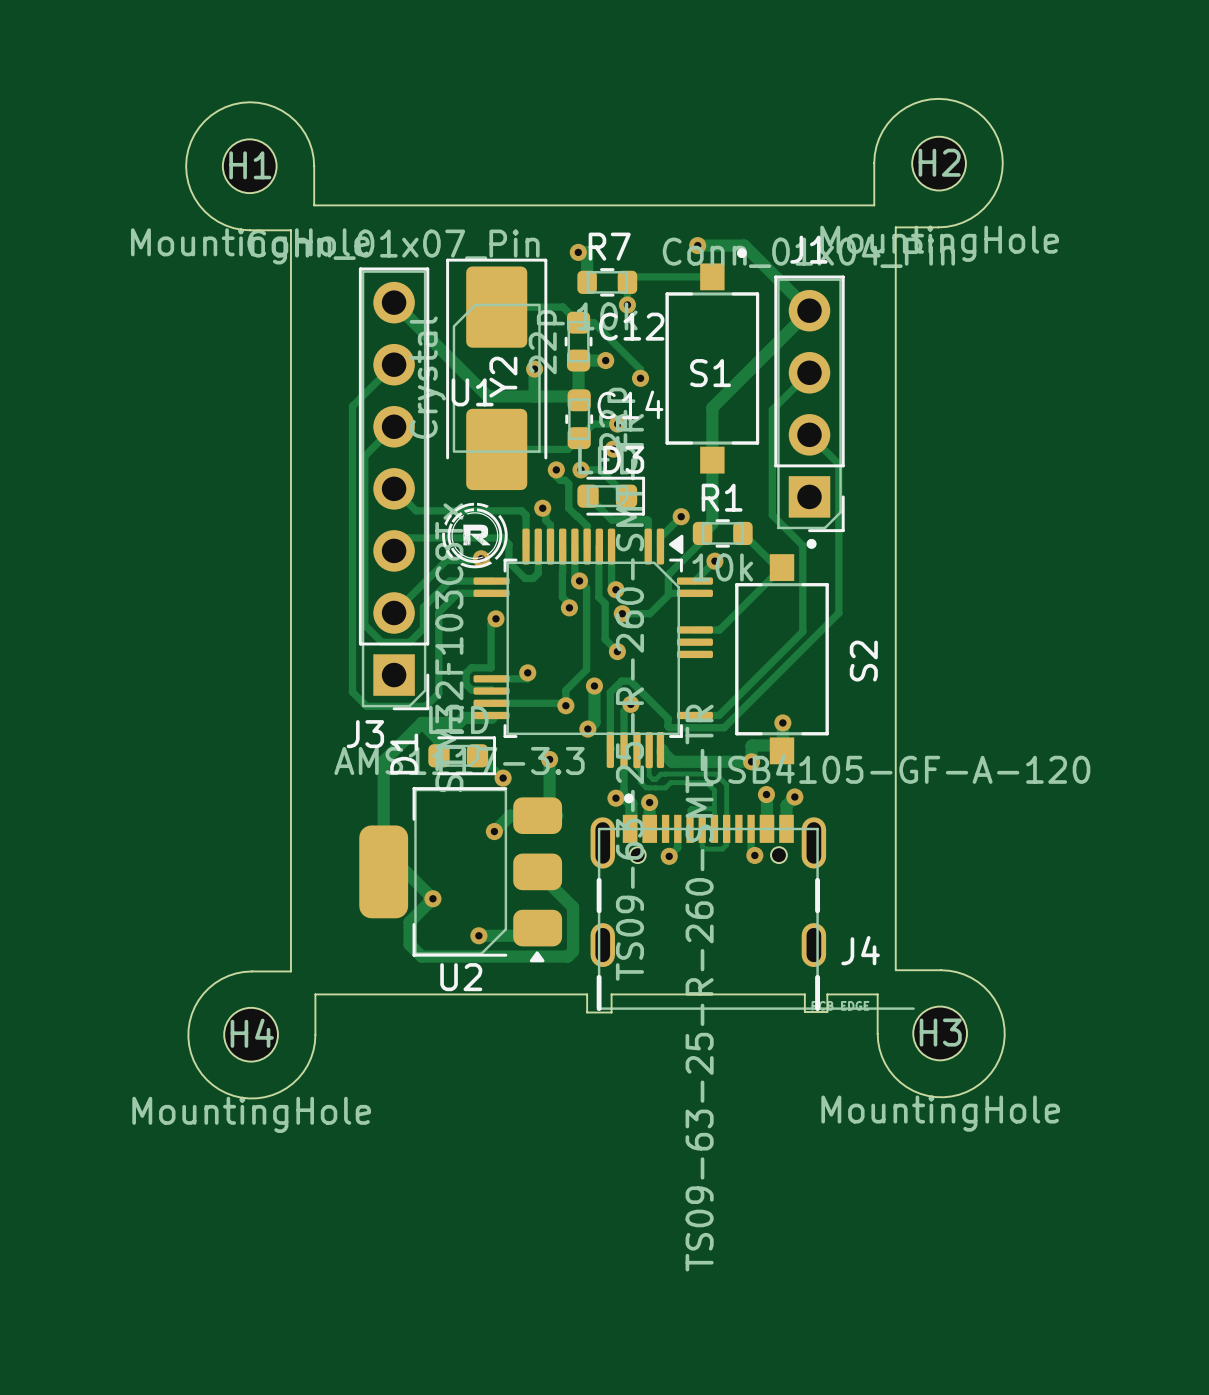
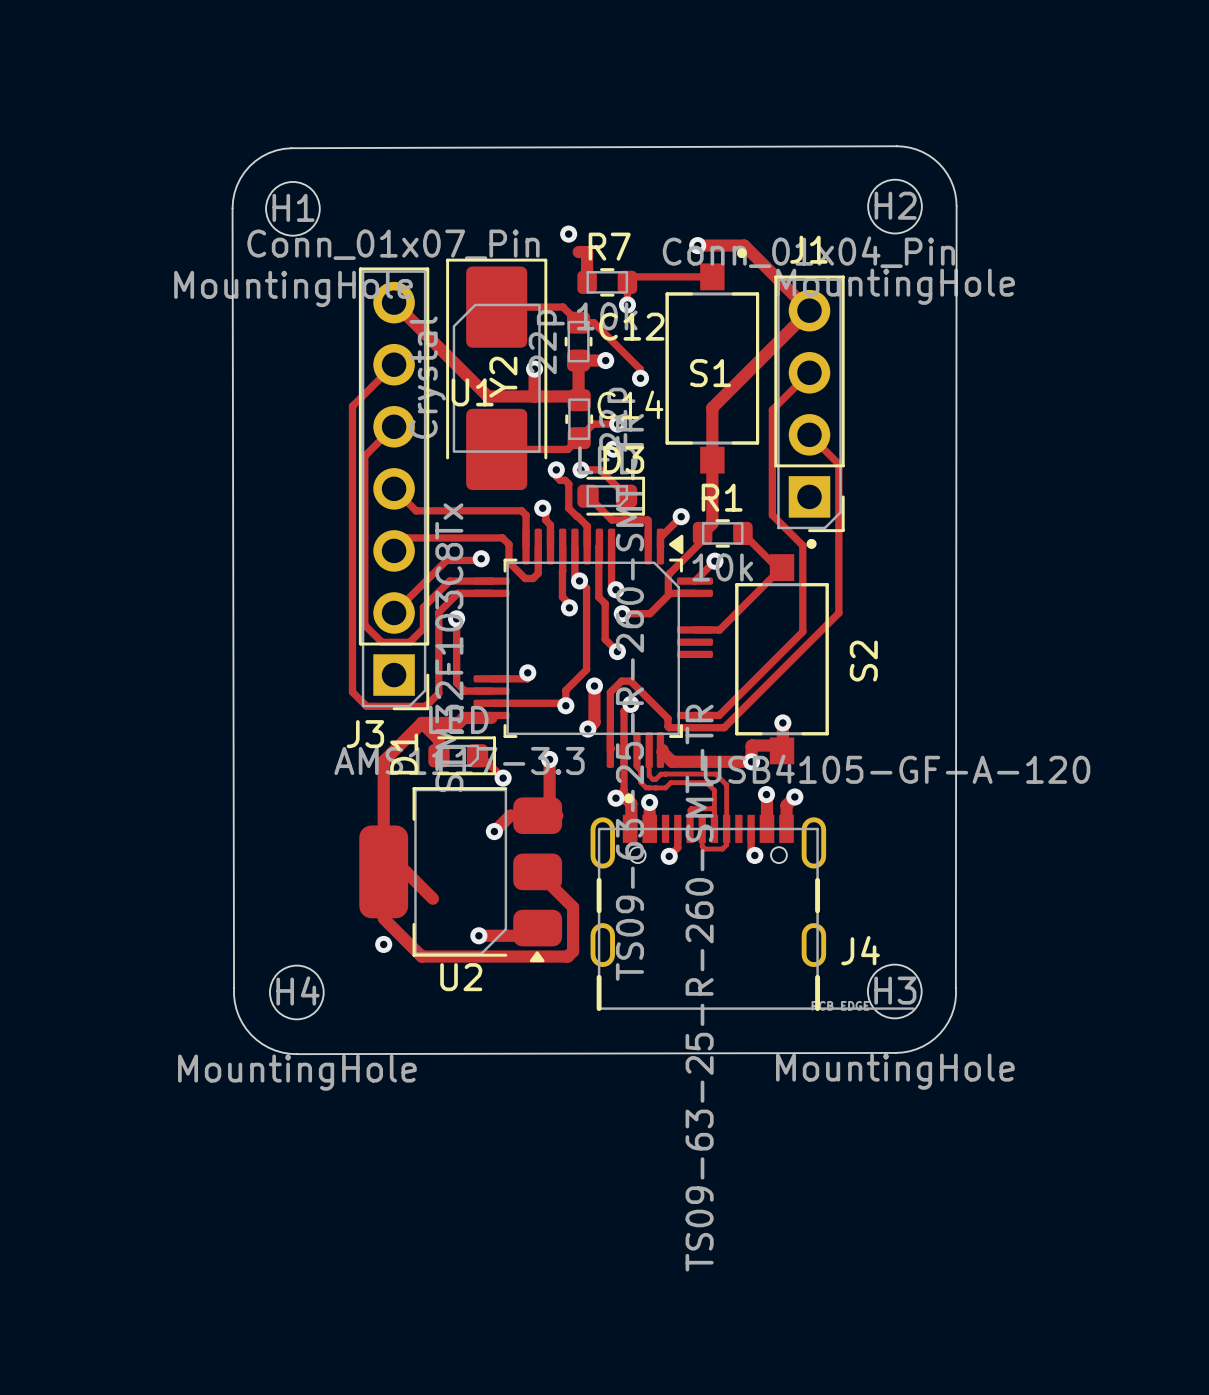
board edge: (874, 163) (874, 205) (314, 205) (314, 166) (312, 149) (305, 134) (289, 115) (266, 104) (241, 102) (218, 110) (199, 127) (188, 149) (186, 174) (191, 190) (204, 211) (218, 221) (233, 228) (250, 230) (290, 230) (290, 971) (236, 973) (214, 983) (198, 1000) (189, 1021) (189, 1045) (197, 1067) (212, 1085) (233, 1095) (257, 1098) (279, 1092) (292, 1083) (307, 1065) (313, 1050) (315, 994) (587, 994) (587, 1012) (611, 1012) (611, 994) (804, 994) (804, 1012) (827, 1012) (827, 994) (877, 994) (879, 1049) (889, 1070) (906, 1086) (928, 1095) (951, 1096) (973, 1088) (991, 1072) (1002, 1051) (1004, 1036) (1001, 1013) (989, 992) (971, 977) (956, 972) (895, 970) (895, 227) (946, 226) (963, 222) (977, 214) (989, 202) (997, 187) (1002, 171) (1002, 154) (994, 130) (977, 112) (963, 103) (938, 98) (913, 103) (893, 117) (879, 138) (874, 163) -> (956, 205) (953, 186) (947, 174) (939, 163) (922, 152) (910, 147) (896, 146) (291, 148) (276, 150) (261, 156) (244, 172) (237, 185) (232, 208) (234, 995) (236, 1009) (242, 1023) (256, 1039) (275, 1050) (297, 1054) (895, 1052) (909, 1051) (923, 1046) (940, 1033) (951, 1015) (956, 994) (956, 206)
H2 position: (939, 163) -> (895, 206)
H1 position: (249, 166) -> (292, 208)
via position: (578, 252) -> (568, 234)
drawing: [442, 502, 508, 569] -> none
track: (495, 618) (491, 623) (491, 667) (471, 667) (466, 673) (466, 684) (471, 689) (491, 691) -> (456, 618) (456, 683) (464, 691) (491, 691)
via position: (495, 618) -> (456, 618)
track: (429, 898) (432, 898) (409, 922) (409, 944) -> (383, 918) (409, 944)
via position: (432, 898) -> (383, 944)
H3 position: (940, 1033) -> (894, 991)
H4 position: (251, 1034) -> (296, 992)

